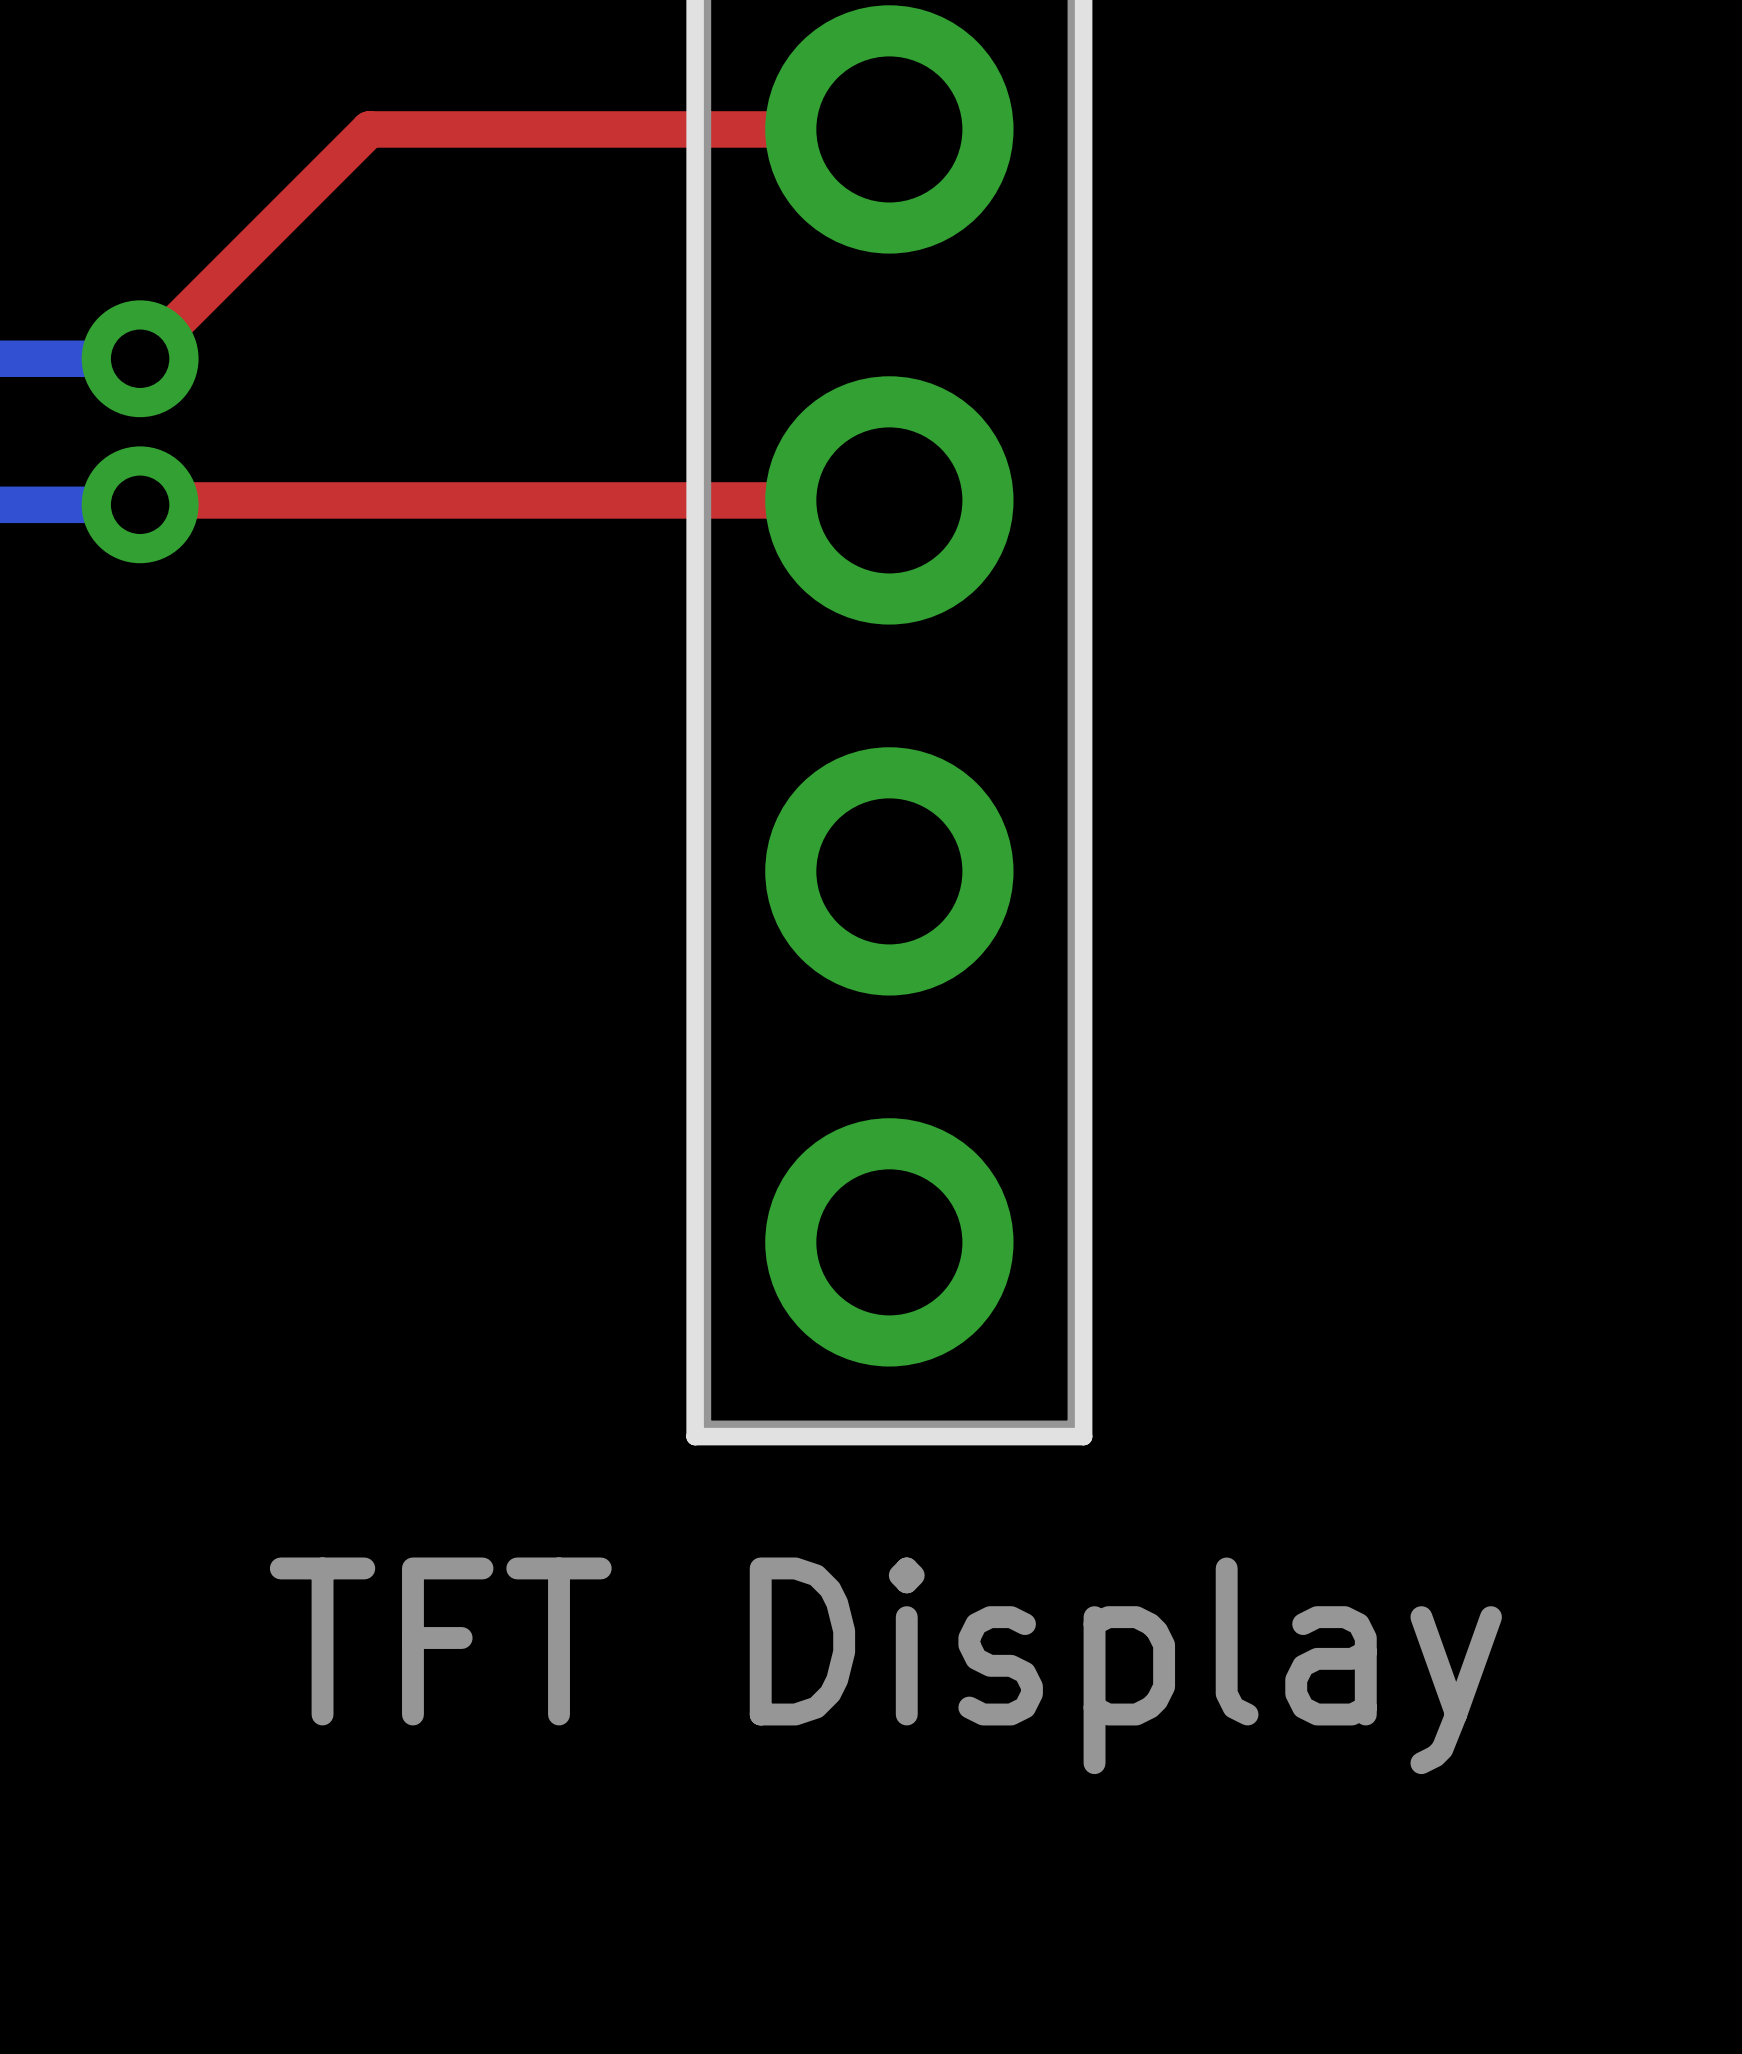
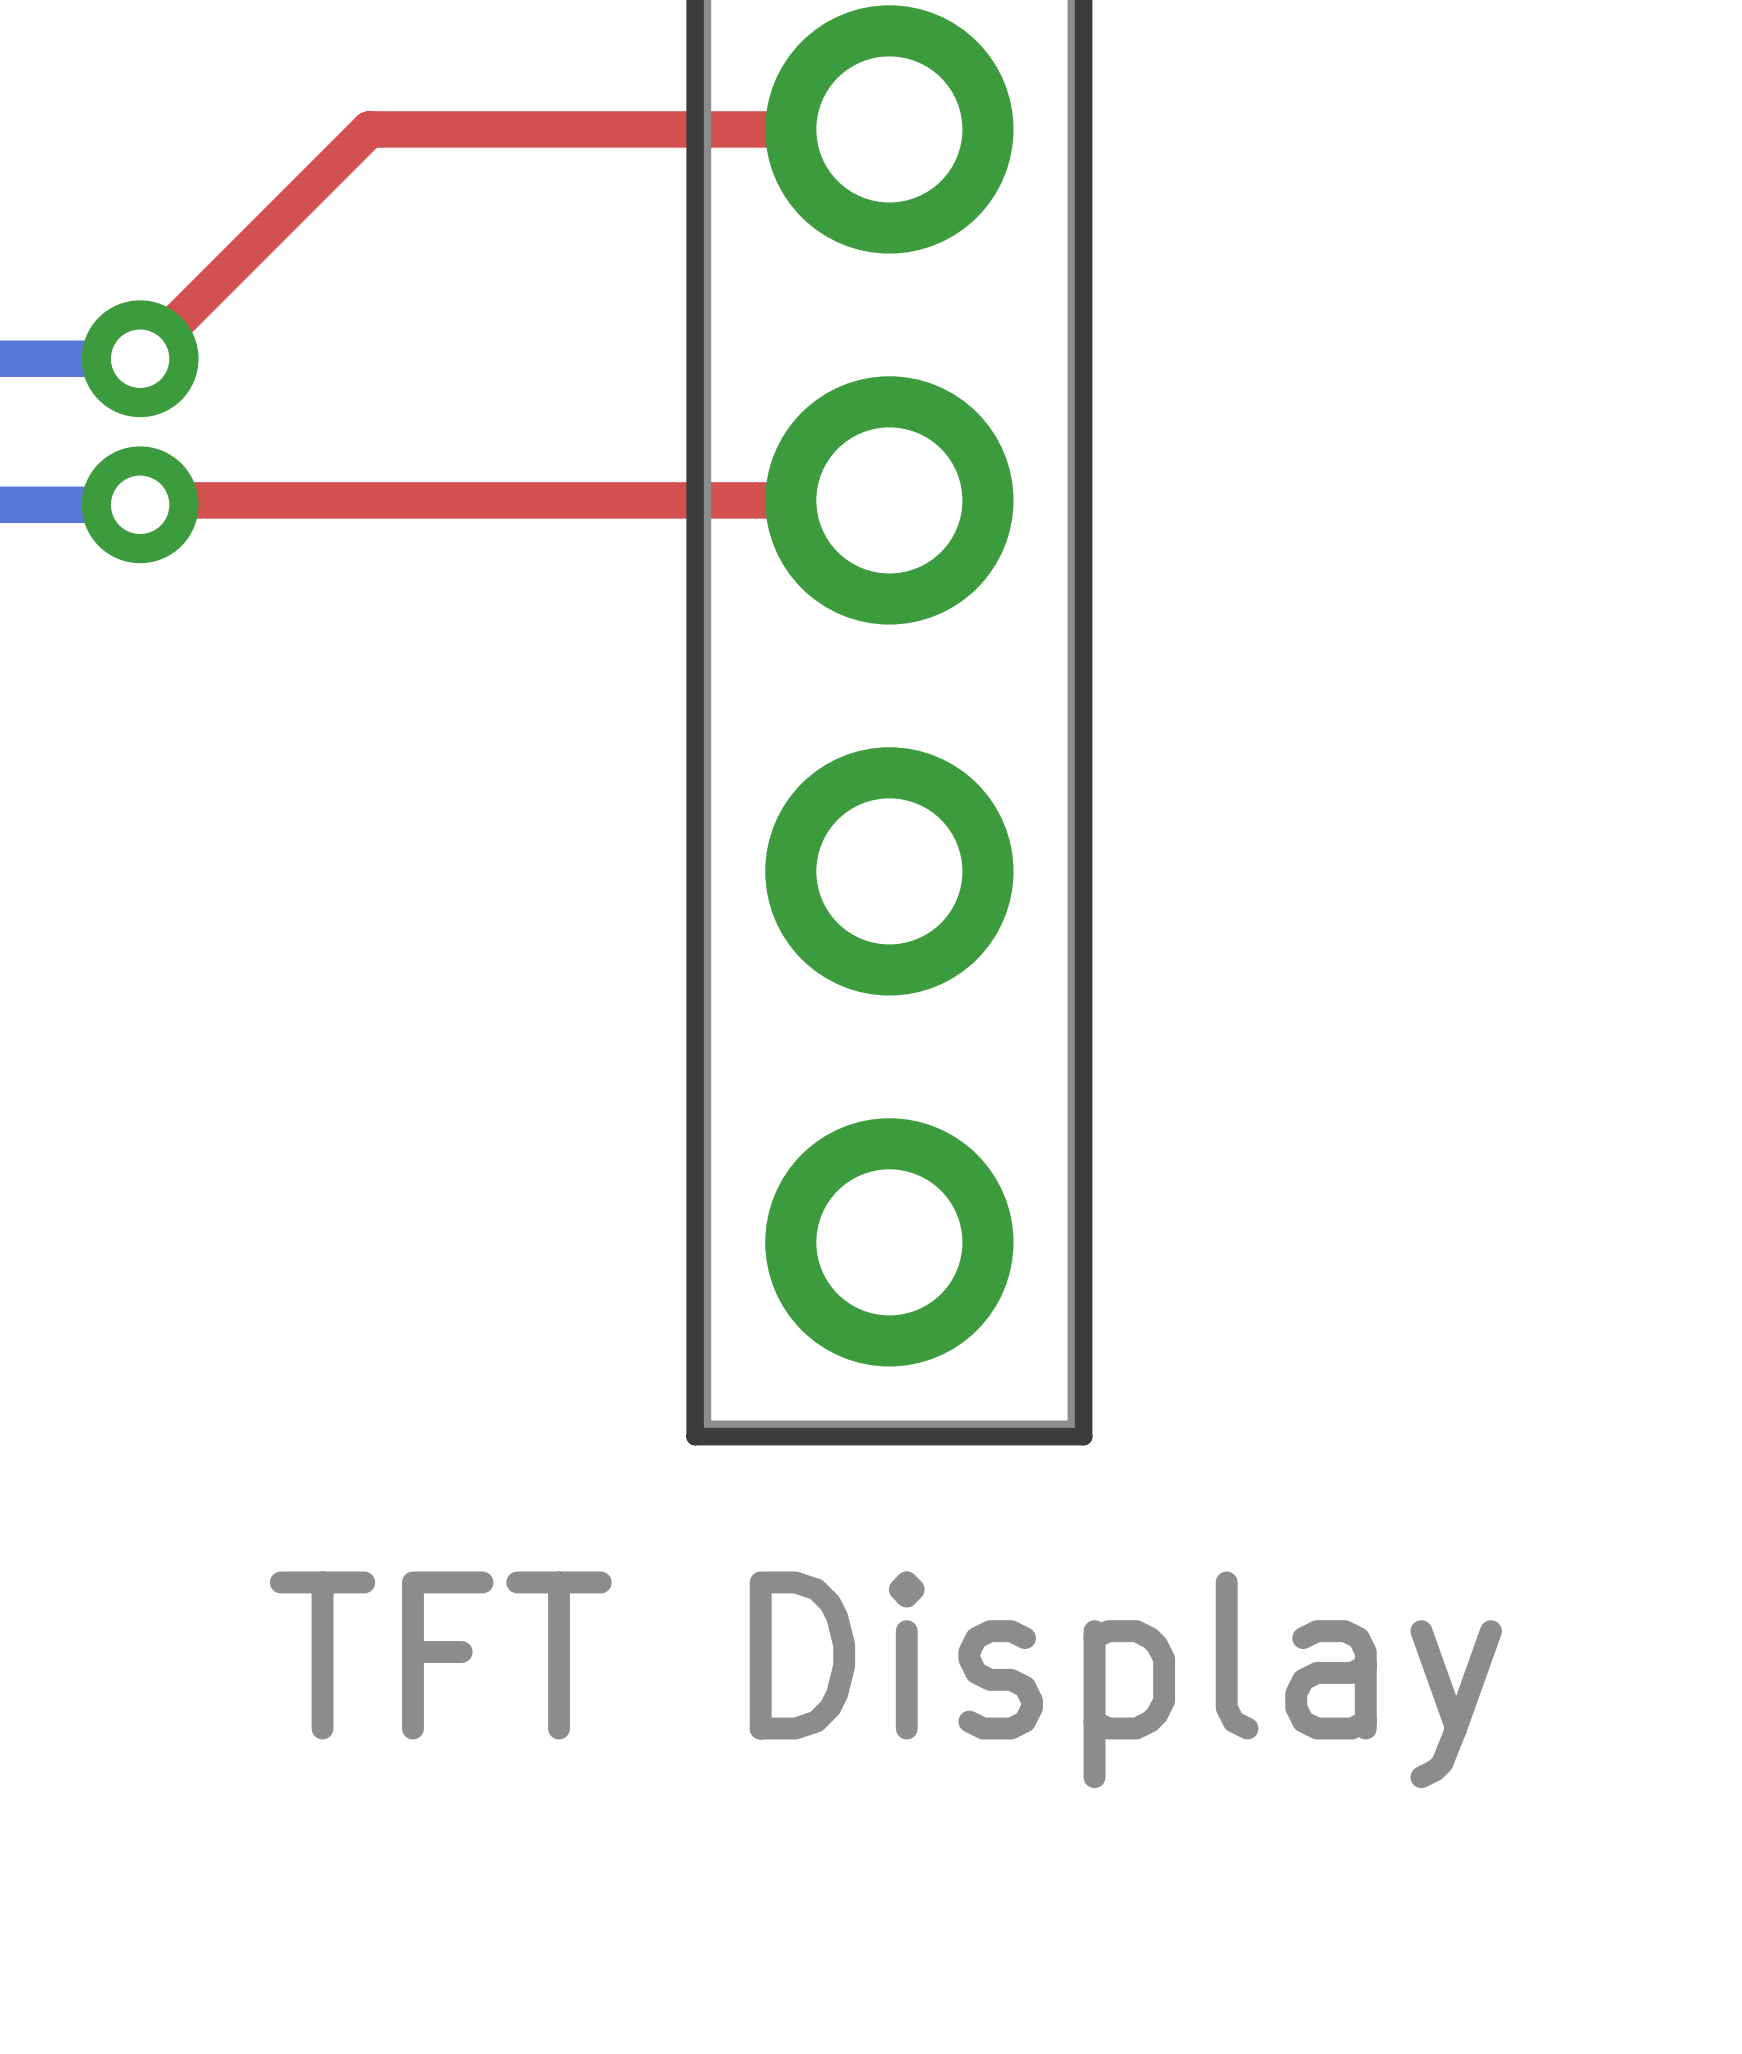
part value position: TFT Display (885, 1665) -> TFT Display (885, 1679)

